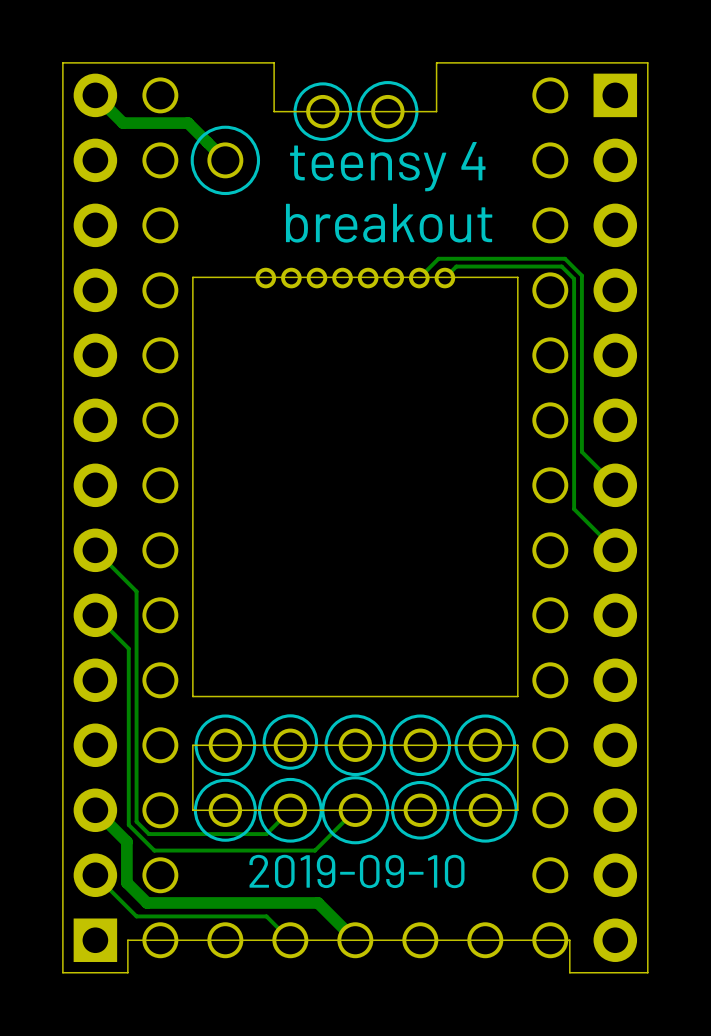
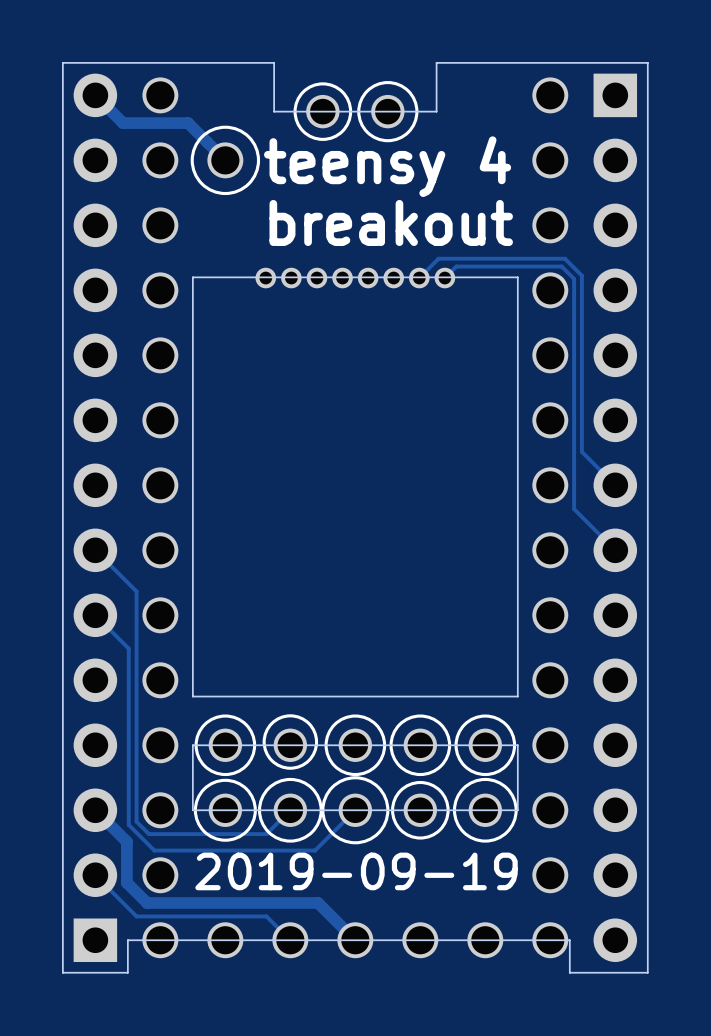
text: 2019-09-10 (356, 871) -> 2019-09-19 (356, 871)

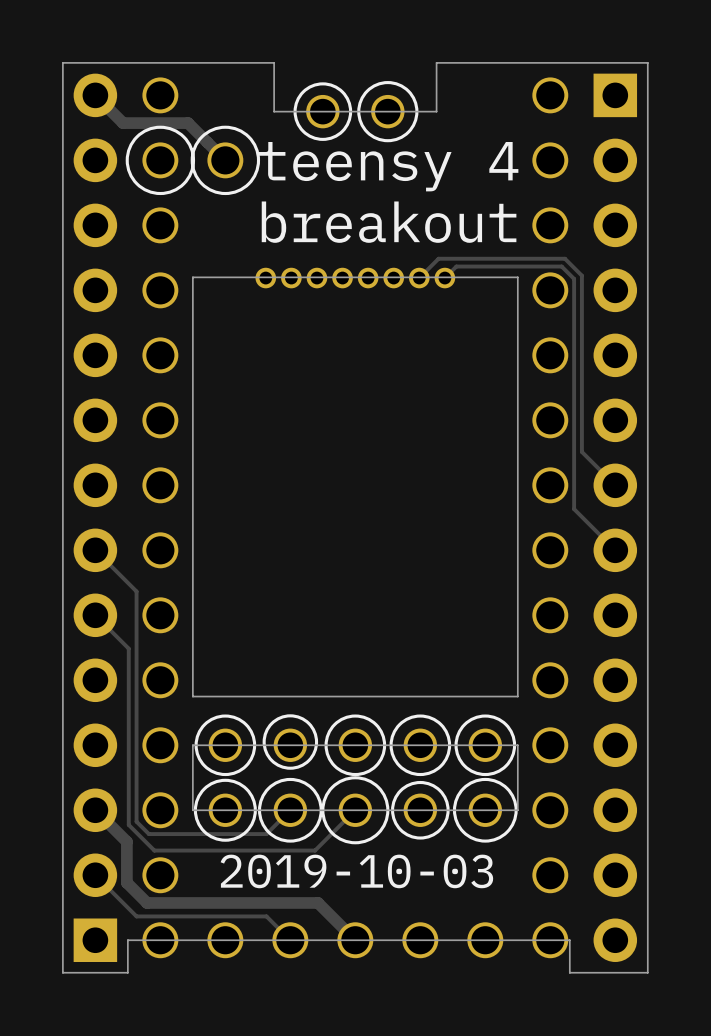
drawing: none -> [125, 125, 196, 196]
text: 2019-09-19 (356, 871) -> 2019-10-03 (356, 871)

